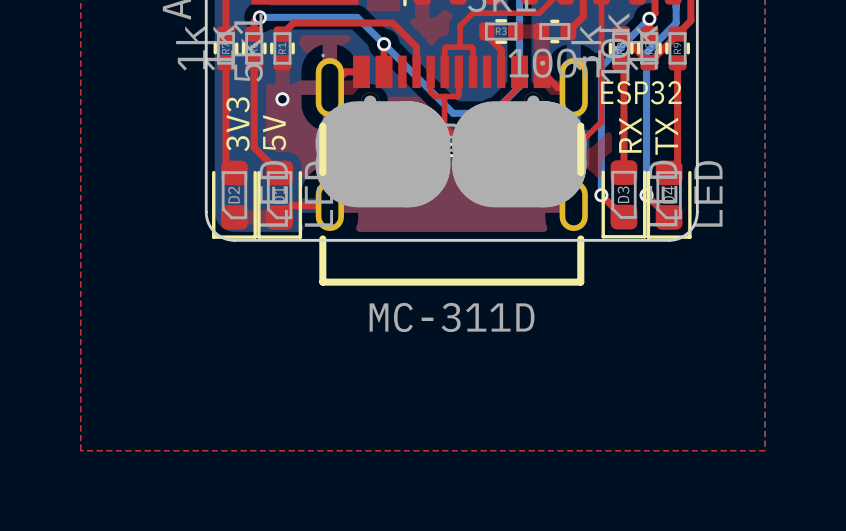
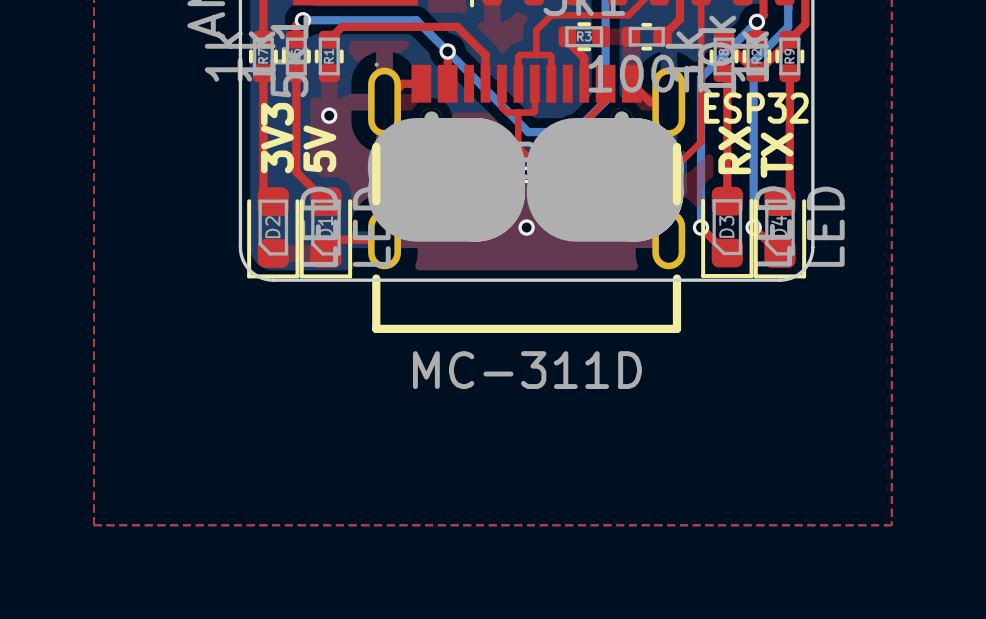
via: none -> (526, 227)

